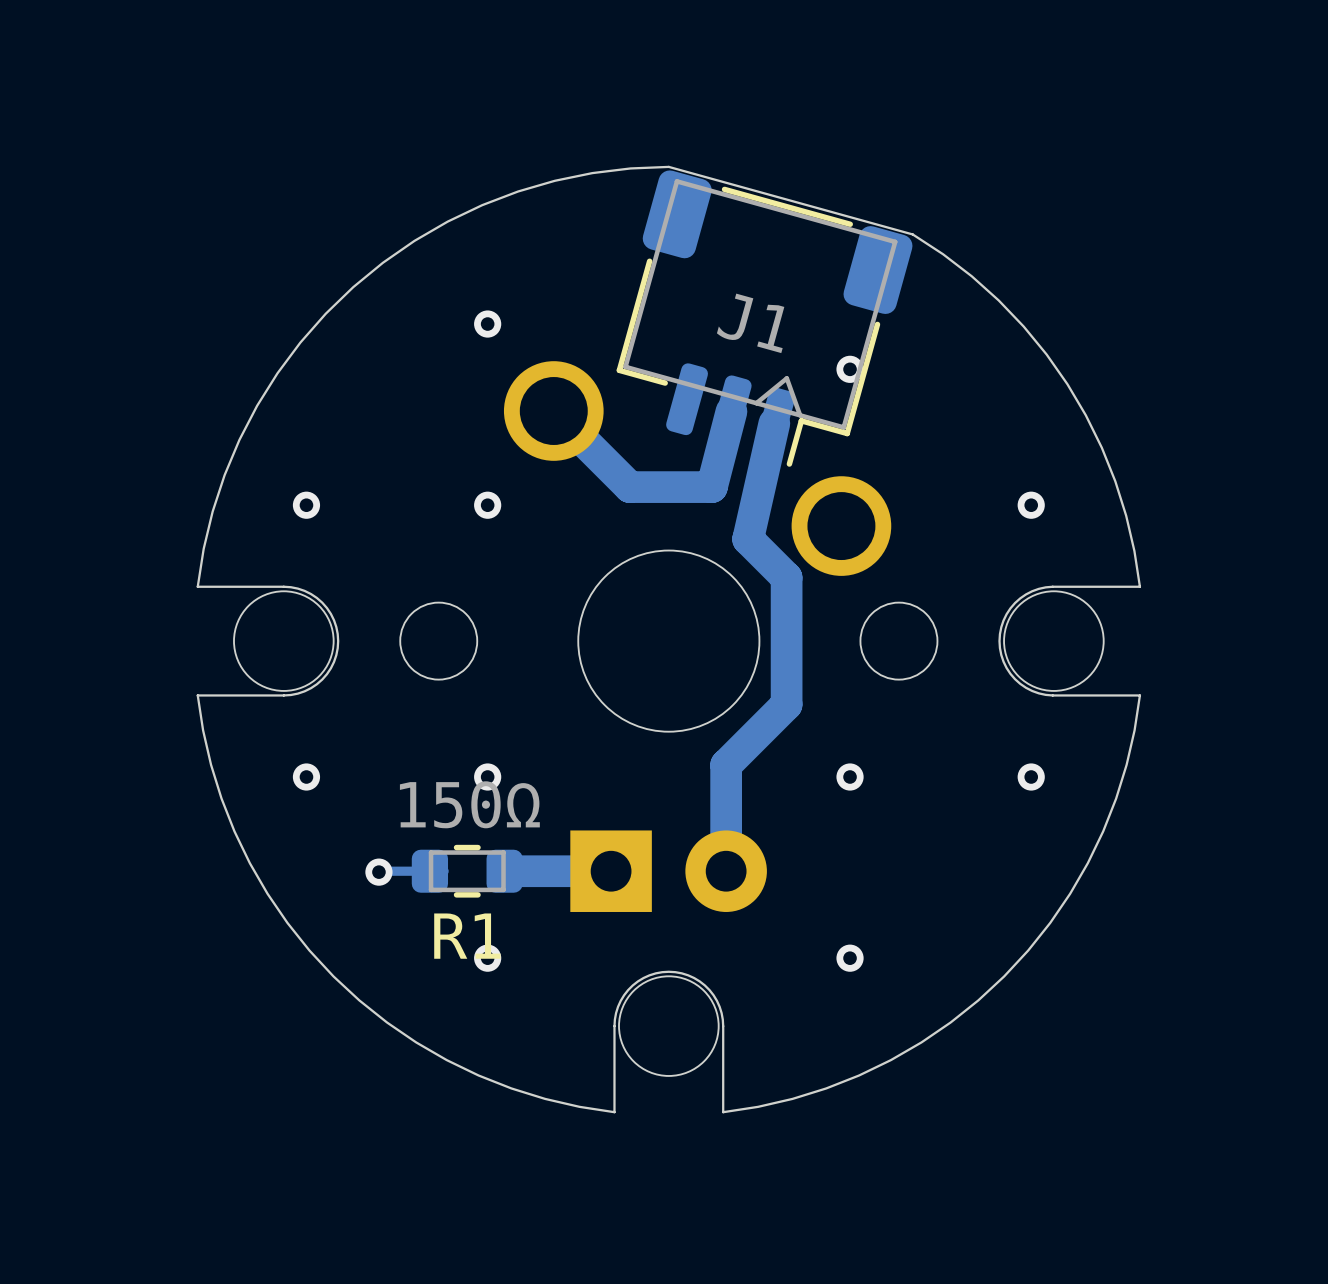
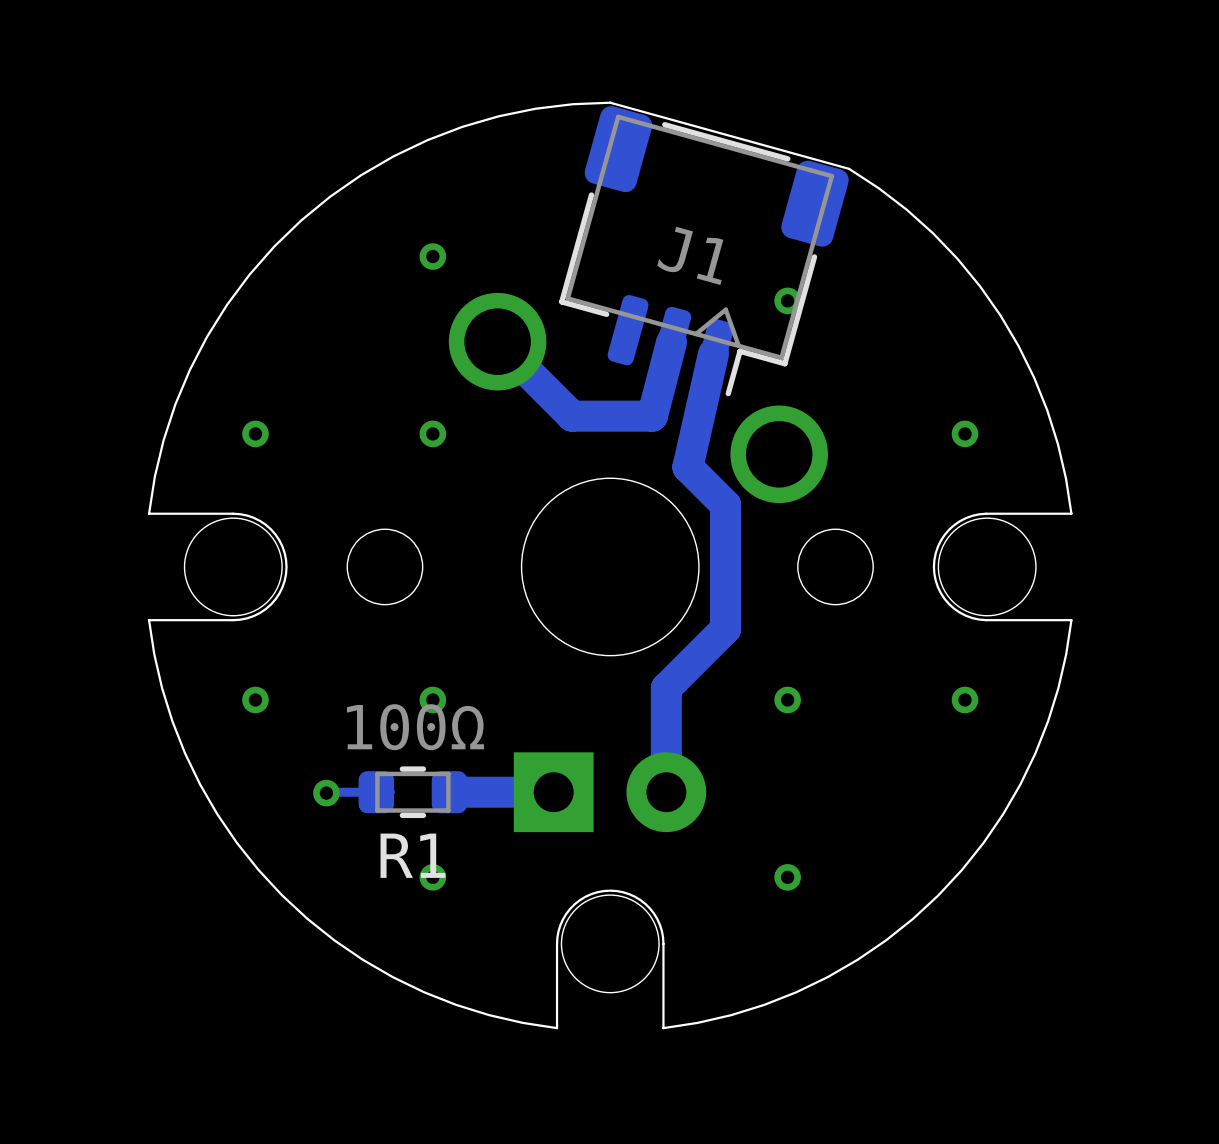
R1 value: 150Ω (469, 804) -> 100Ω (415, 727)

